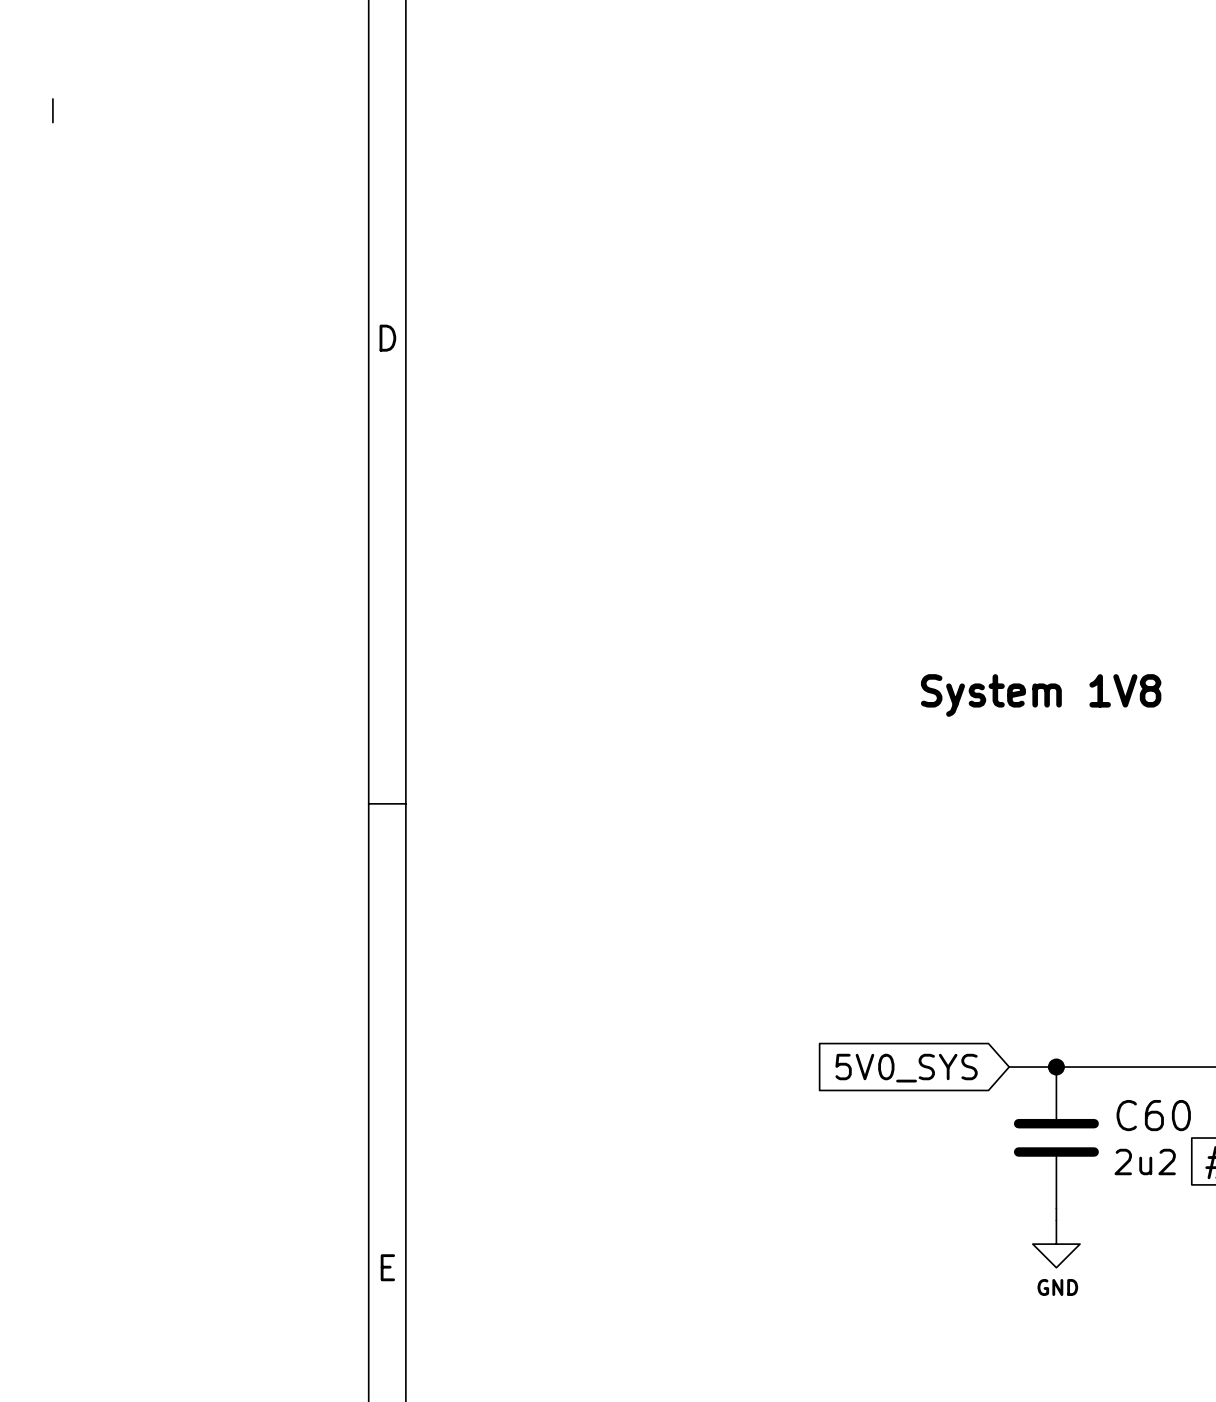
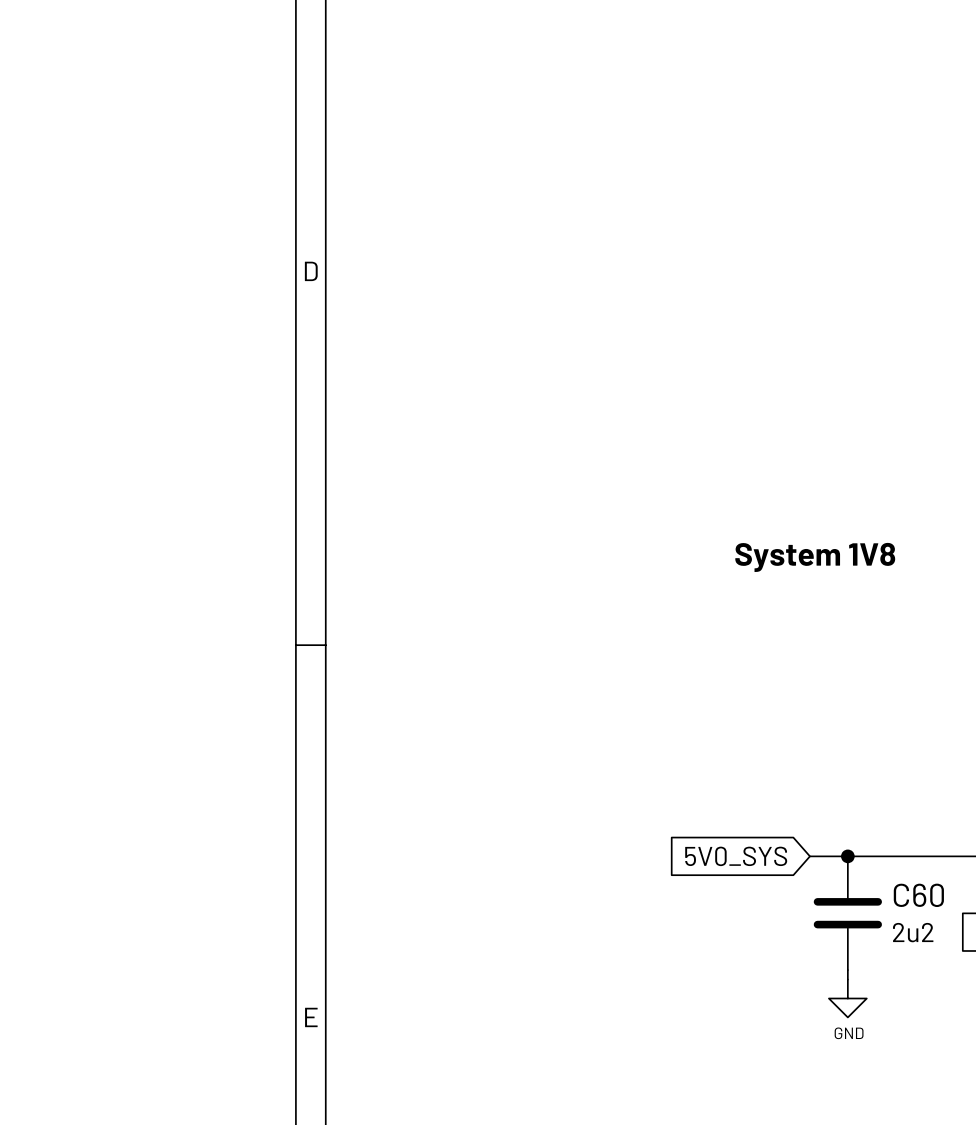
wire: (52, 98) (52, 122) -> none

